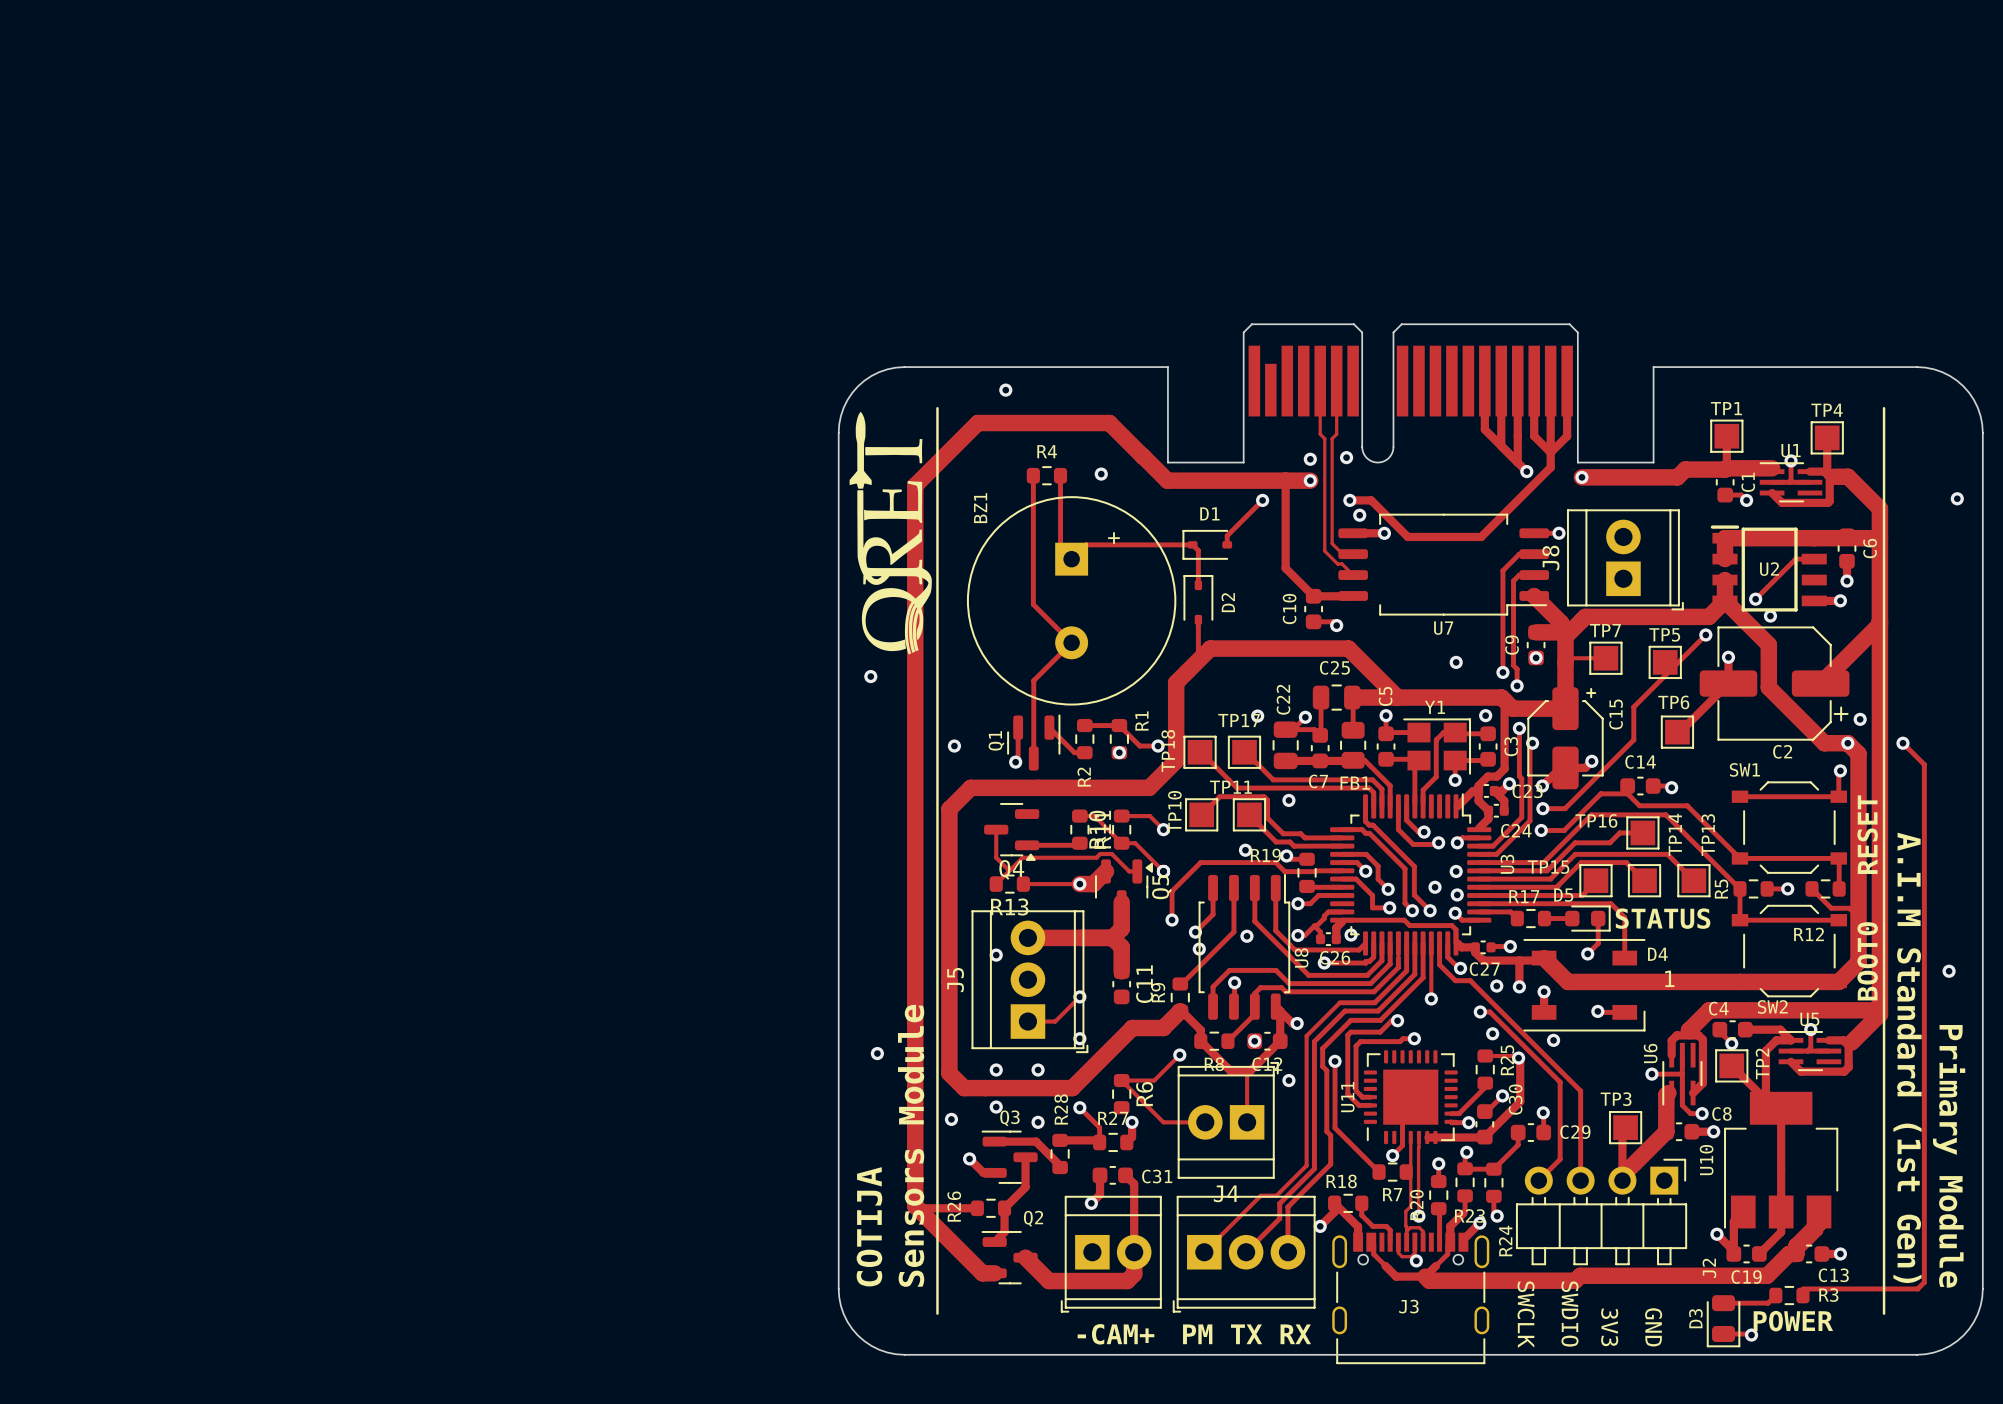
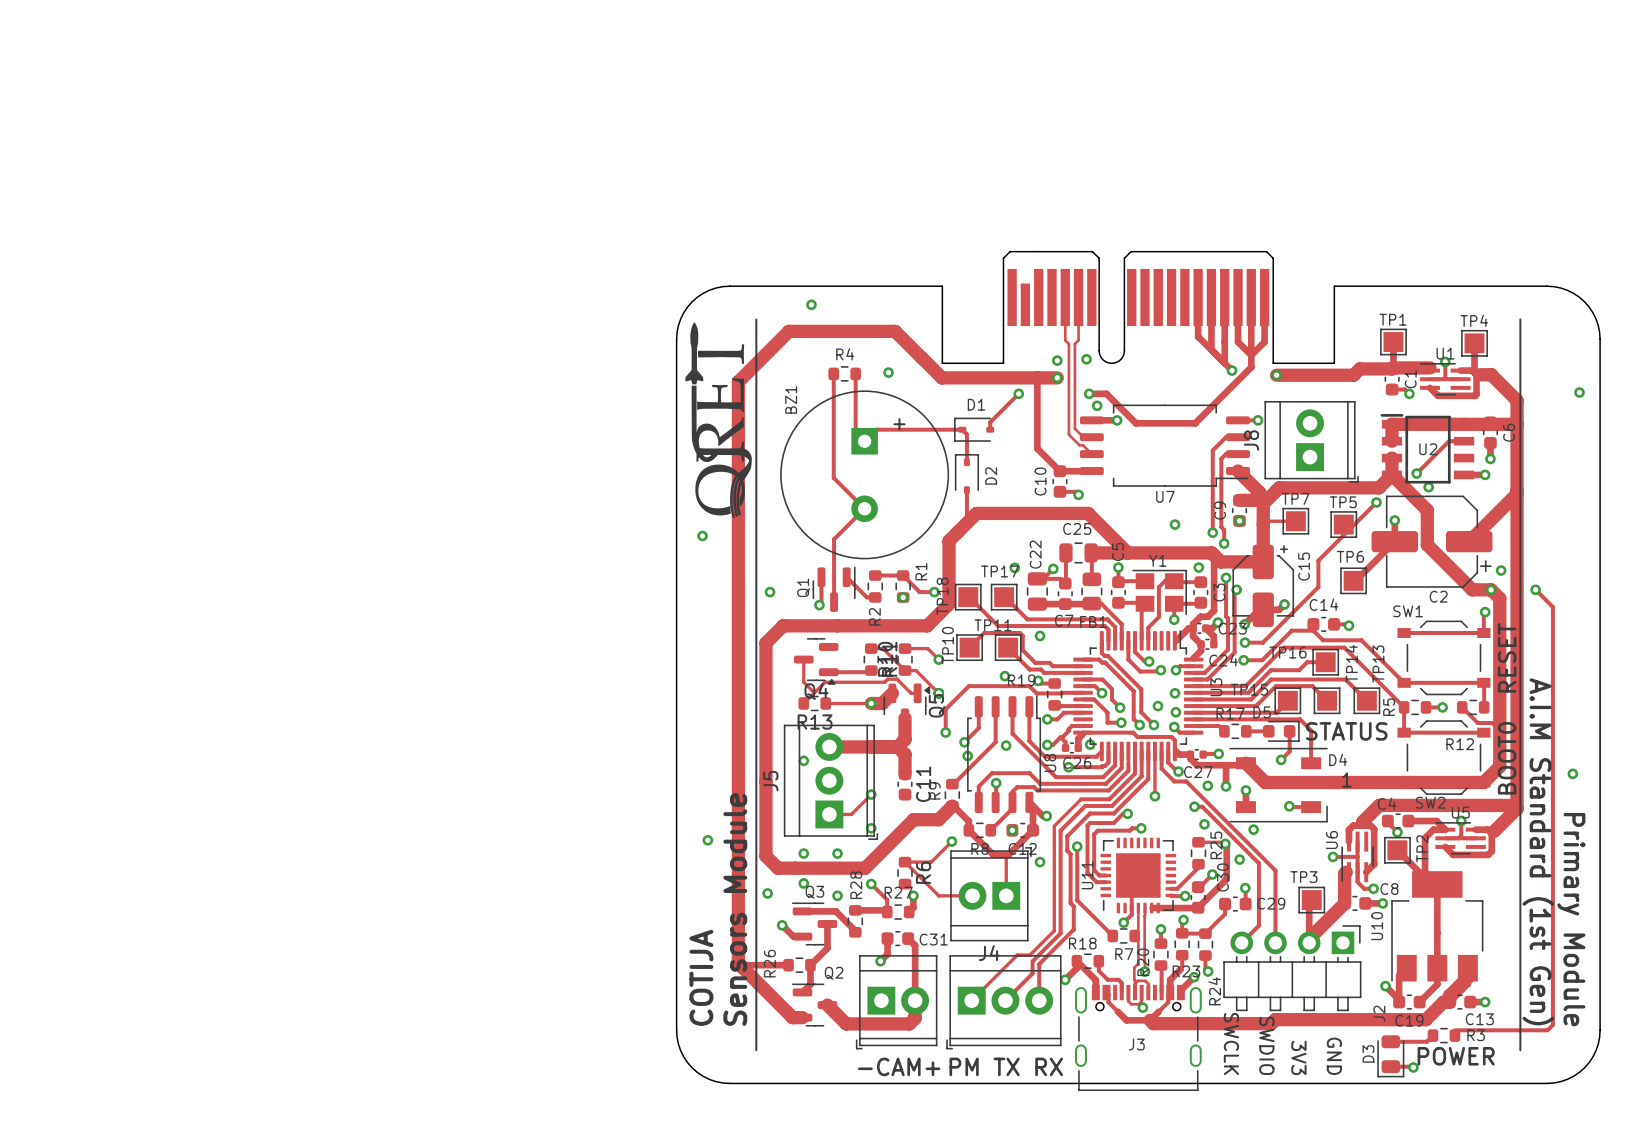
via: none -> (1239, 859)

